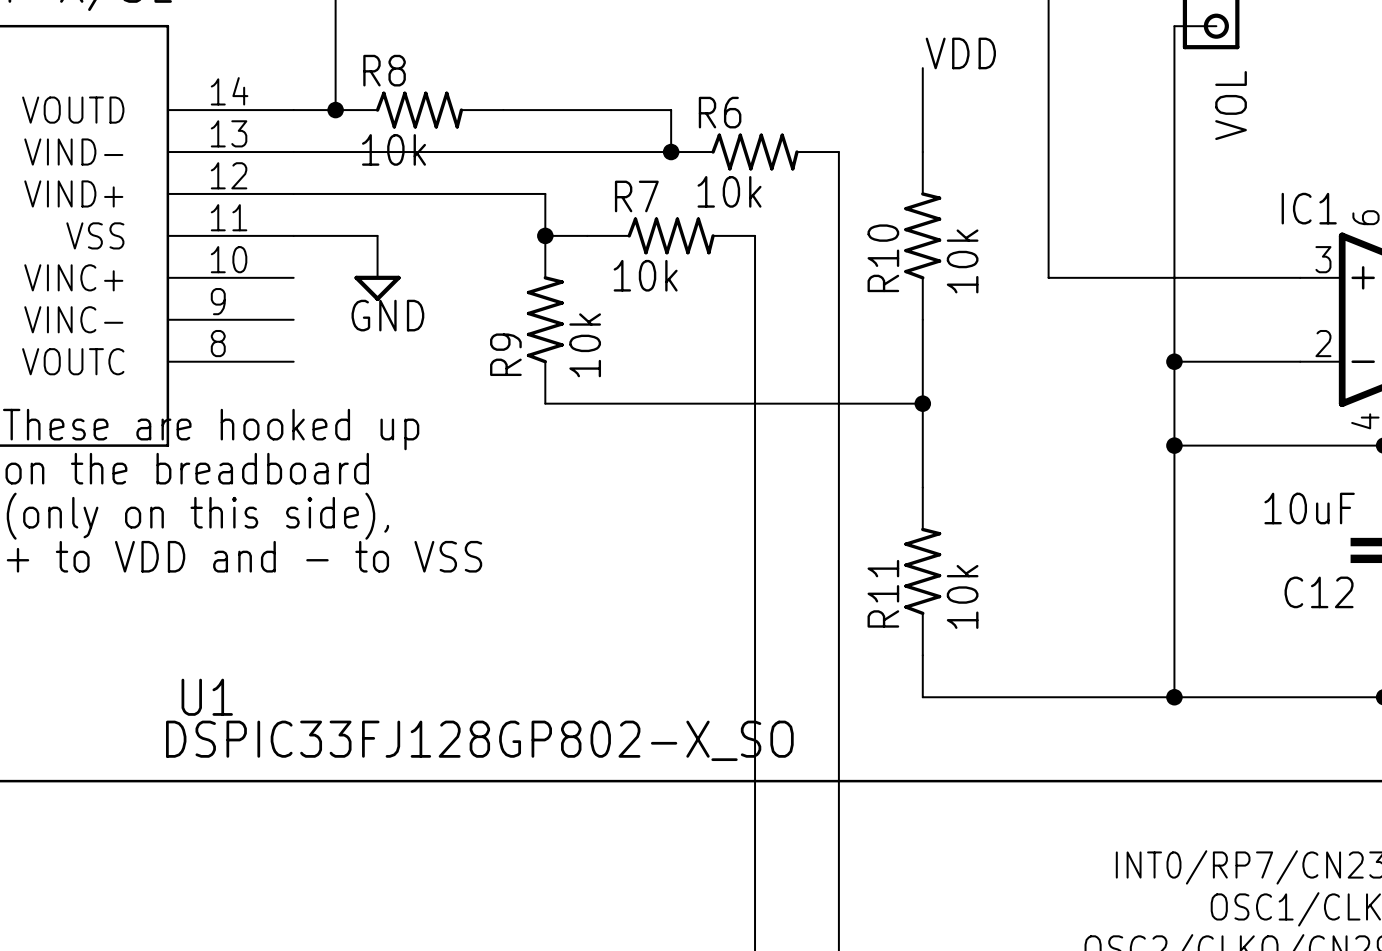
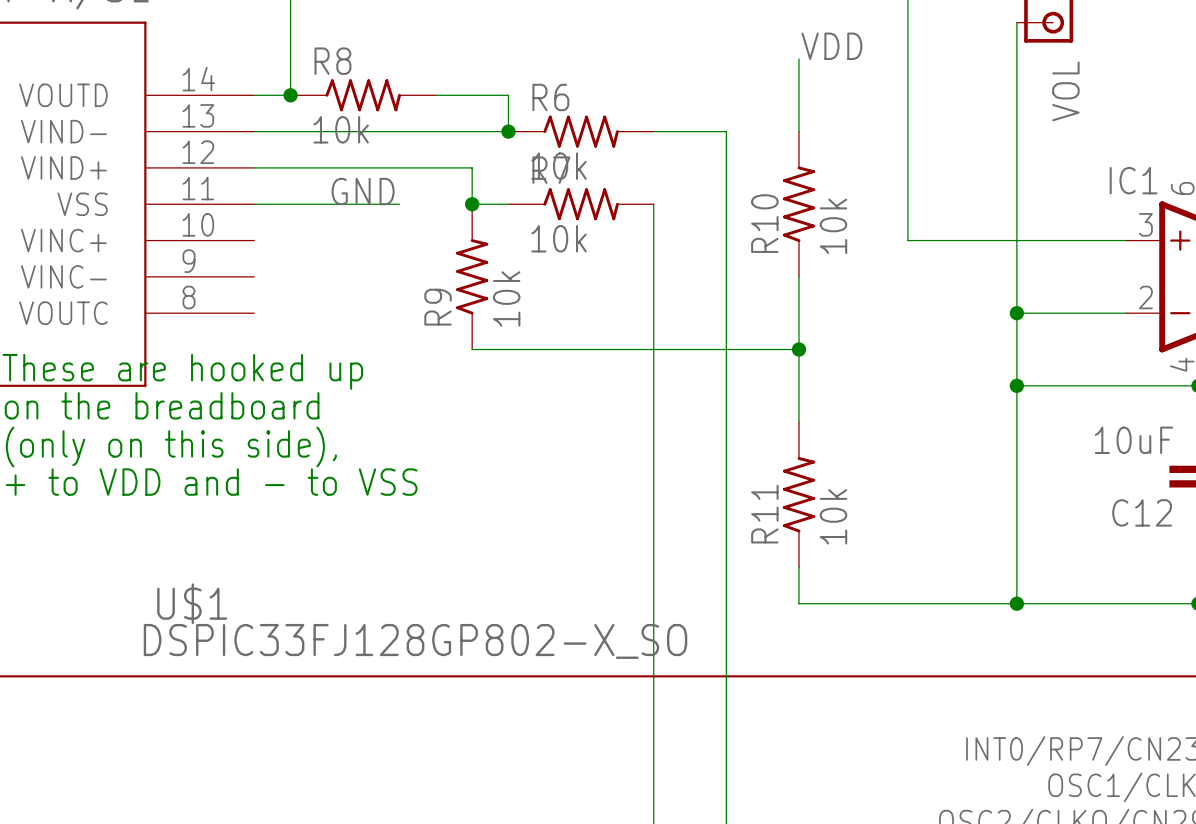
wire: (587, 110) (671, 110) (671, 152) (587, 152) -> (508, 95) (508, 131)
junction position: (671, 152) -> (508, 131)
R6 position: (755, 152) -> (581, 131)
label: none -> GND (363, 191)
wire: none -> (326, 204) (399, 204)
power symbol: GND (377, 268) -> none
U1 name: U1 (207, 697) -> U$1 (192, 603)

